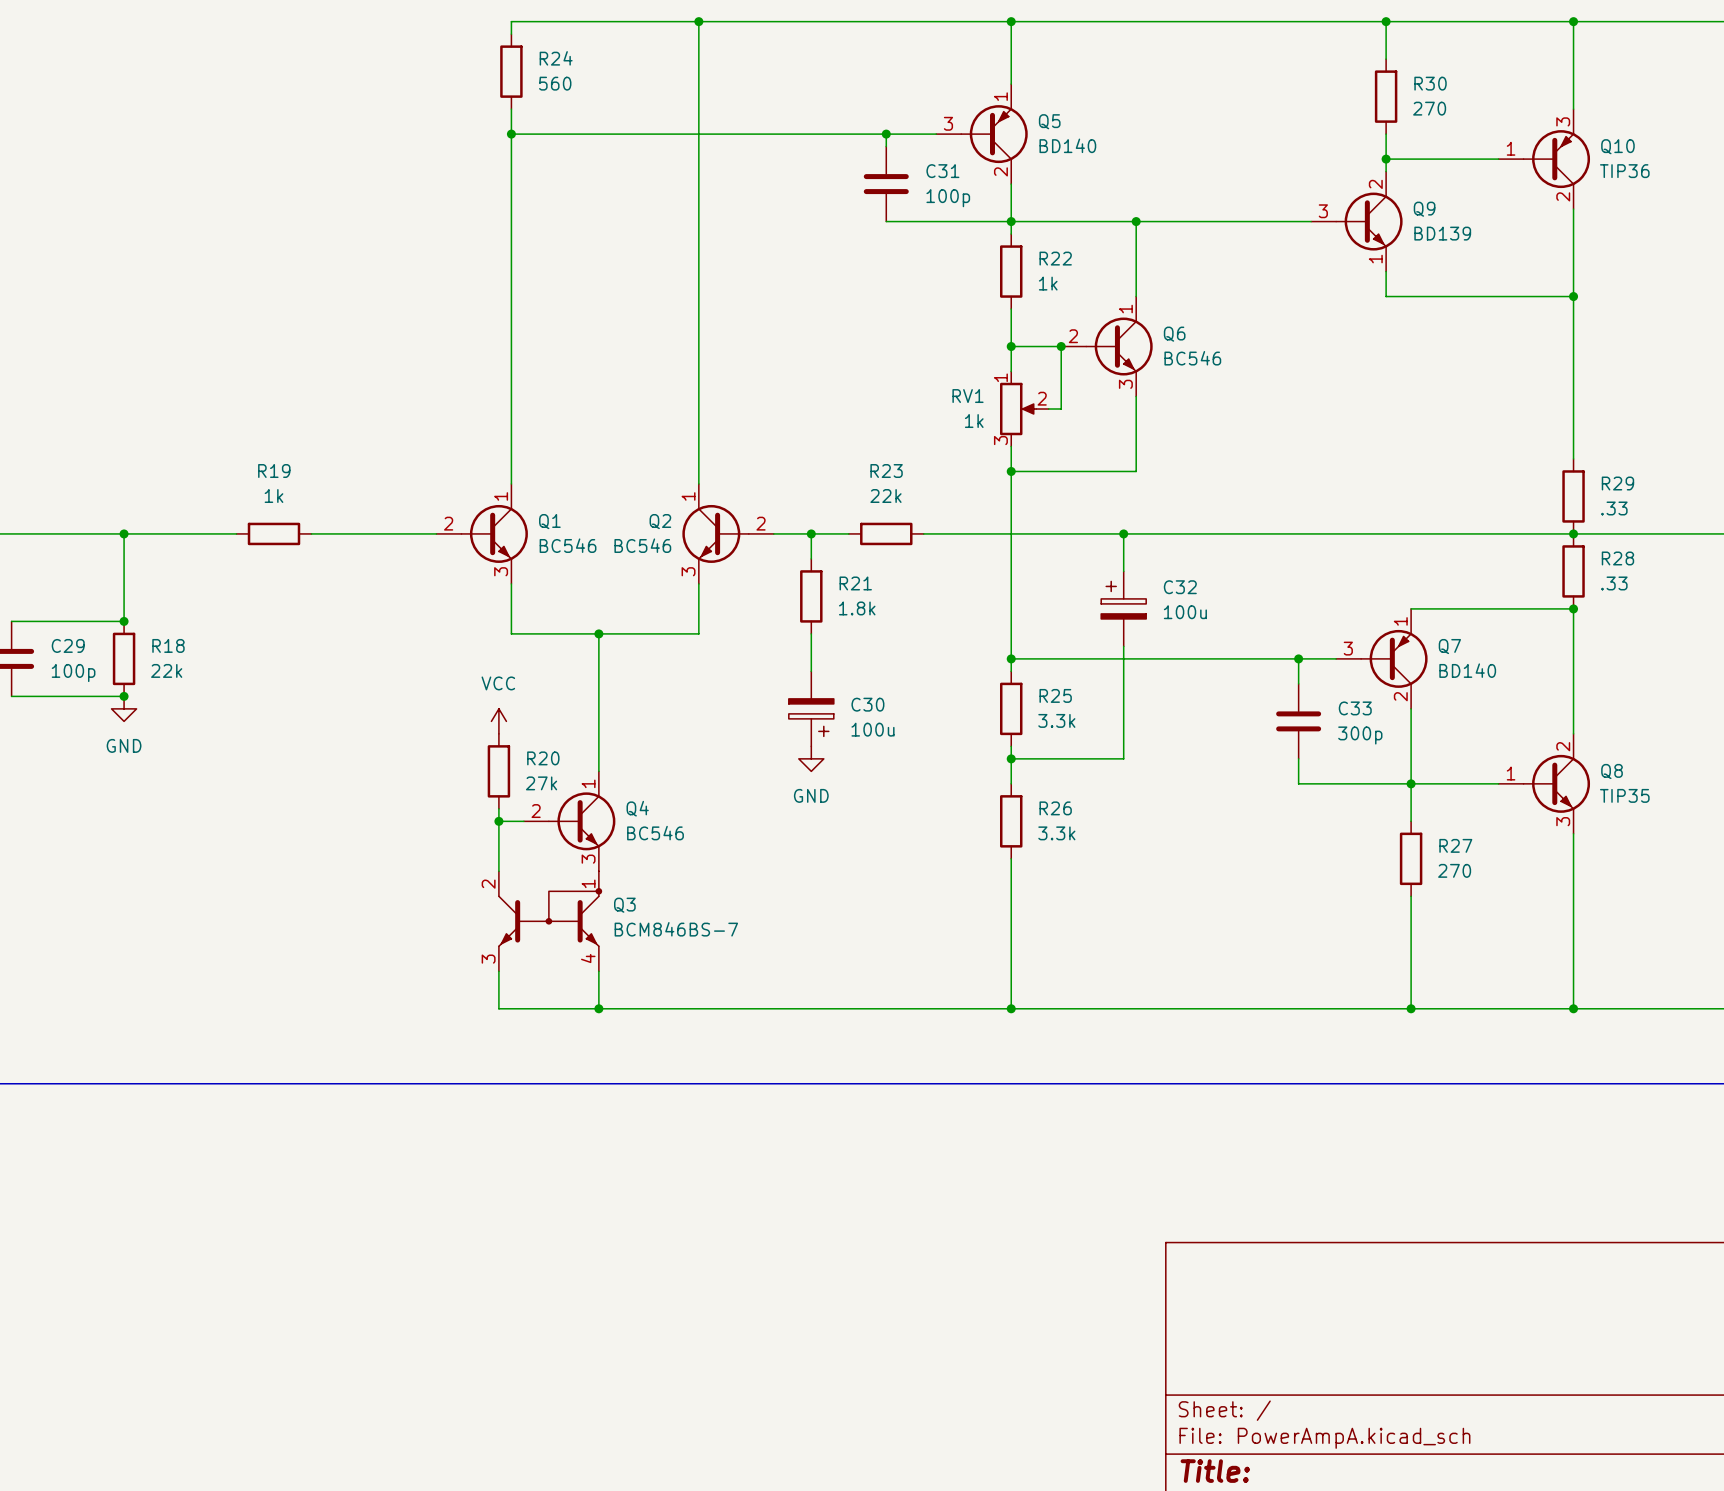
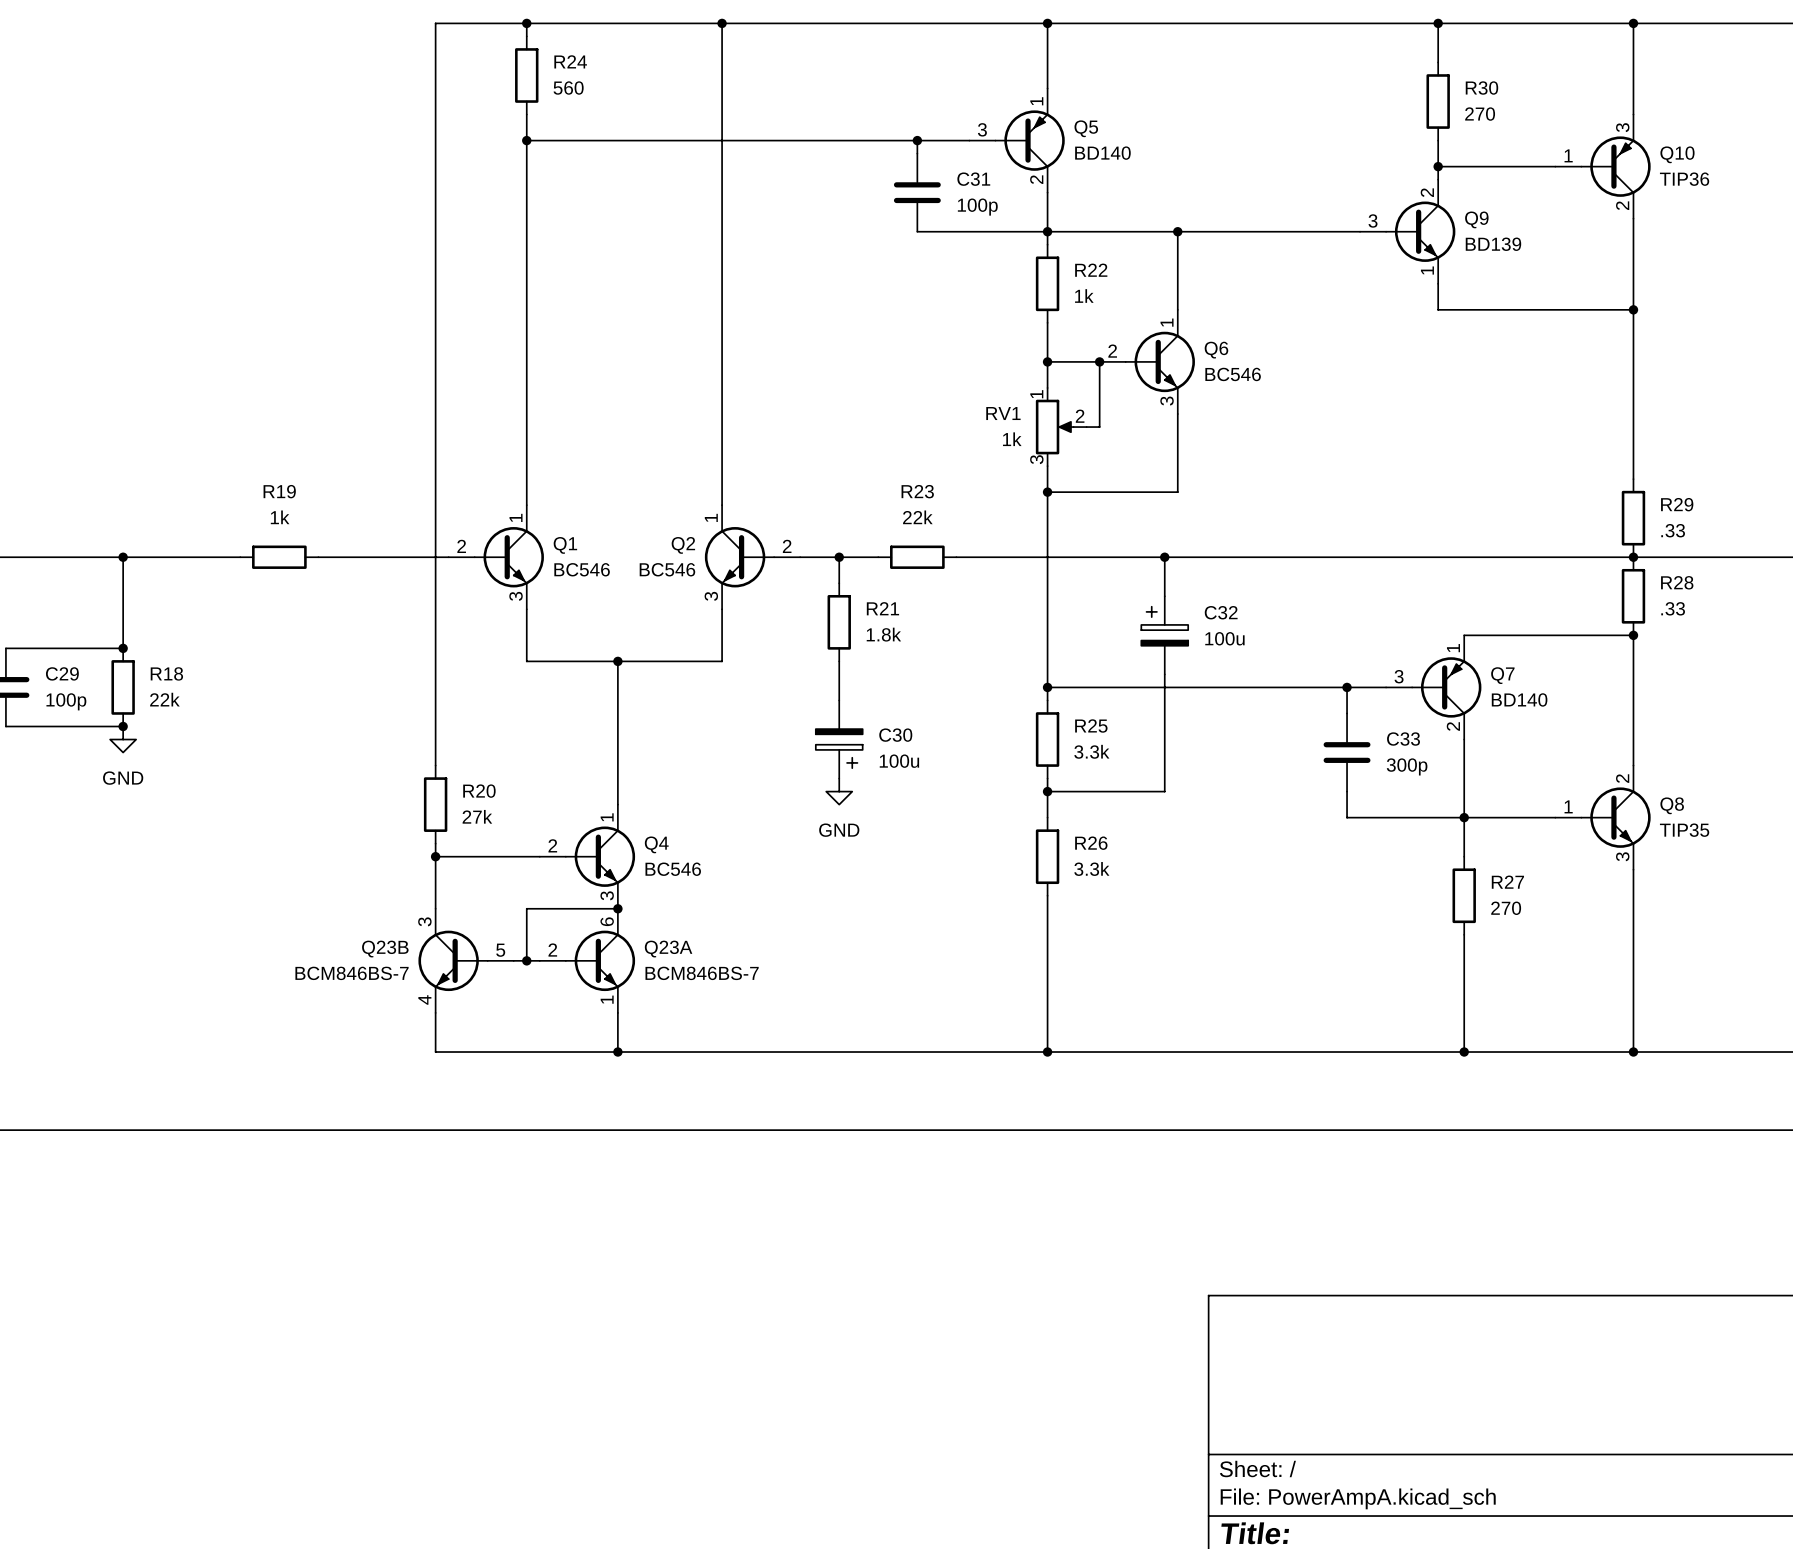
wire: none -> (526, 23) (435, 23) (435, 765)
junction: none -> (526, 23)
power symbol: VCC (498, 721) -> none
R20 position: (498, 771) -> (435, 804)
wire: (498, 808) (498, 871) -> (435, 843) (435, 908)
wire: none -> (435, 856) (513, 856)
junction: none -> (435, 856)
junction: (498, 821) -> none
wire: none -> (617, 908) (526, 908) (526, 960)
junction: none -> (617, 908)
Q23B: none -> BCM846BS-7 (466, 960)
wire: none -> (513, 960) (539, 960)
junction: none -> (526, 960)
Q3: BCM846BS-7 (550, 921) -> none
Q23A: none -> BCM846BS-7 (587, 960)
wire: (498, 971) (498, 1008) -> (435, 1012) (435, 1052) (513, 1052)

